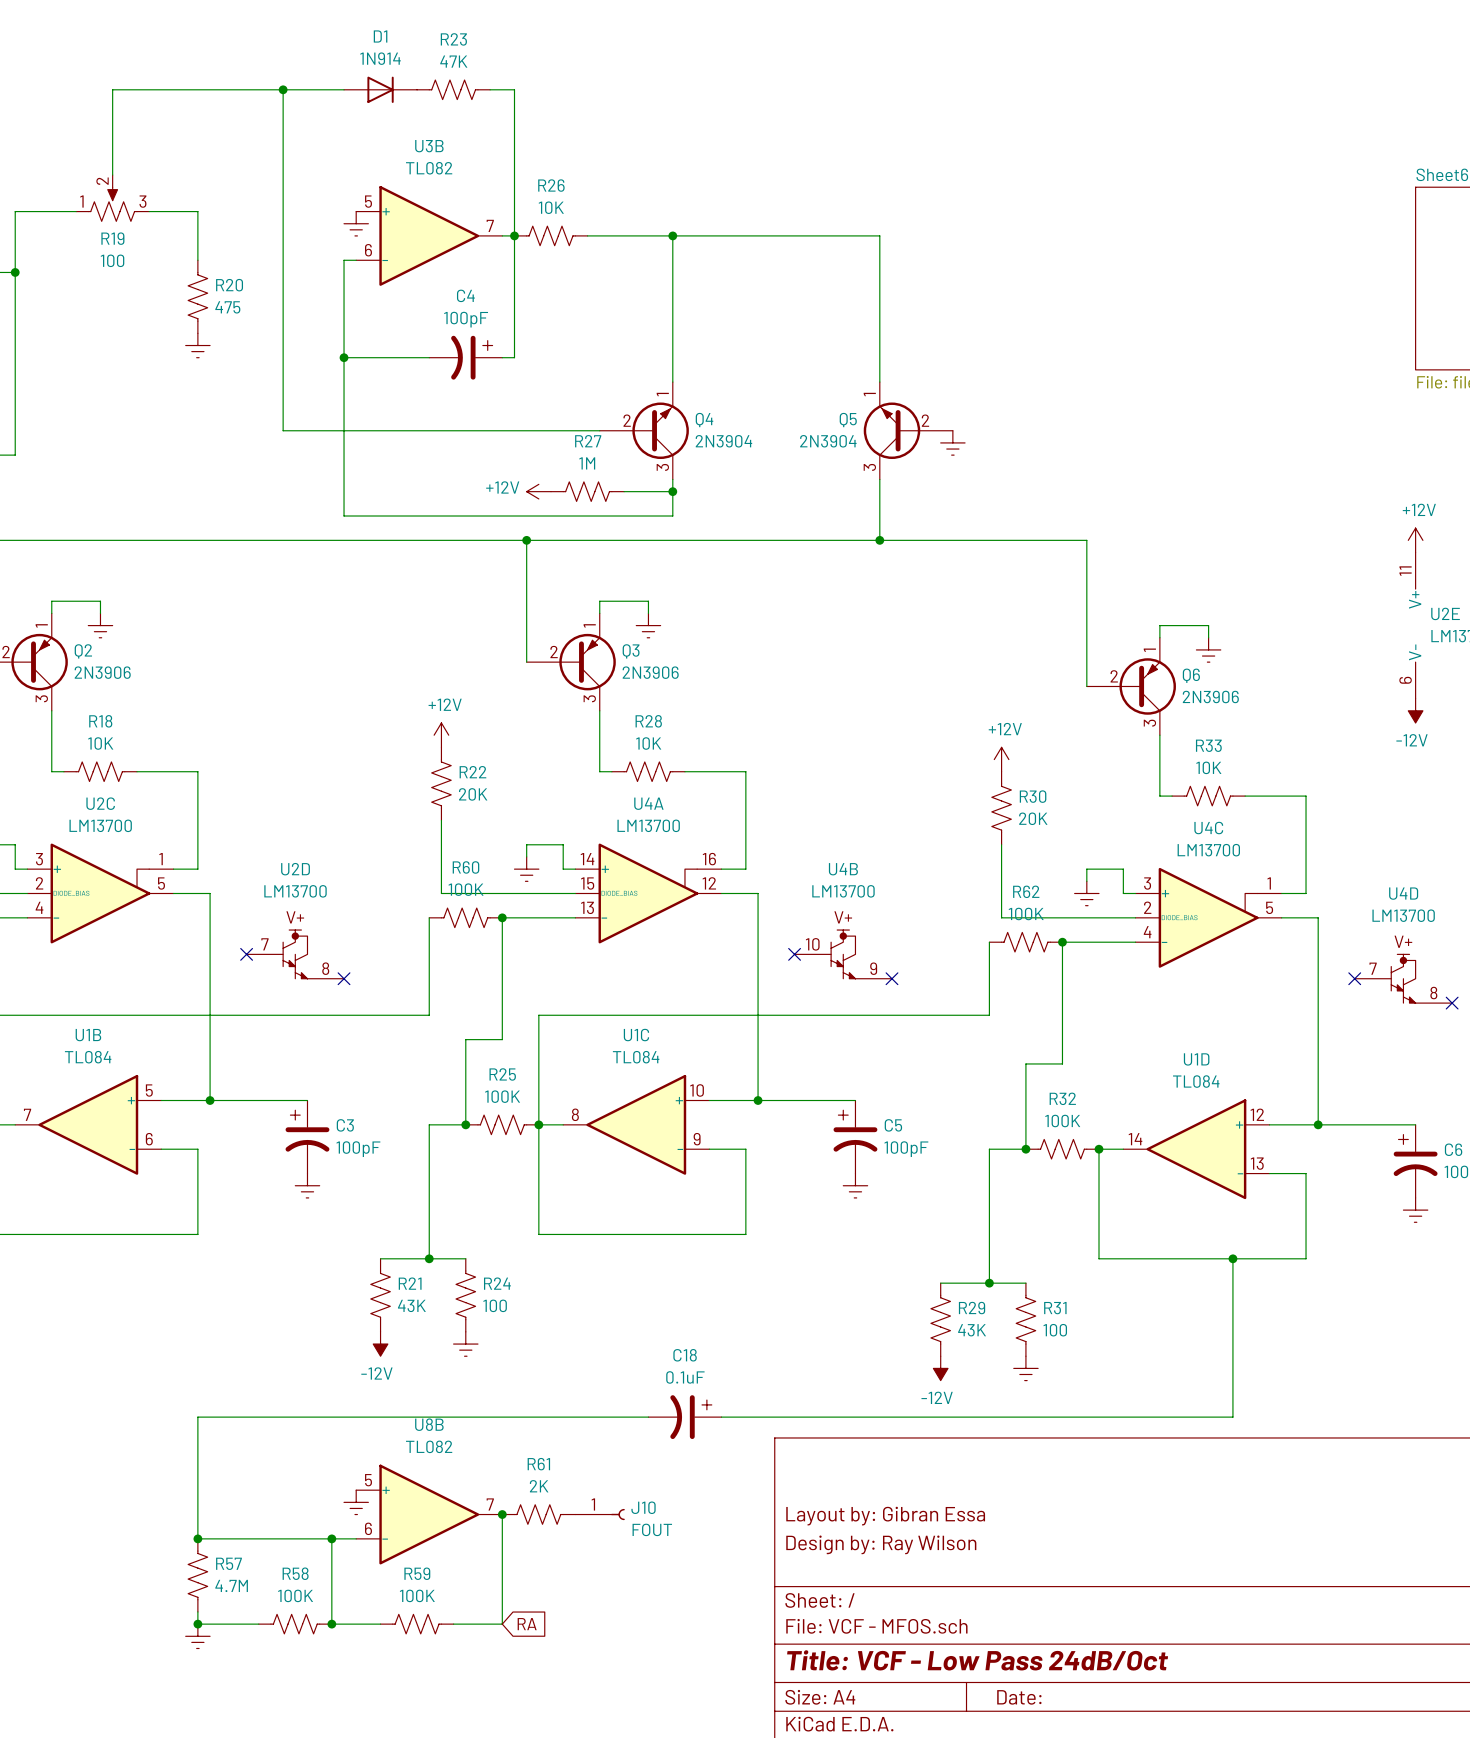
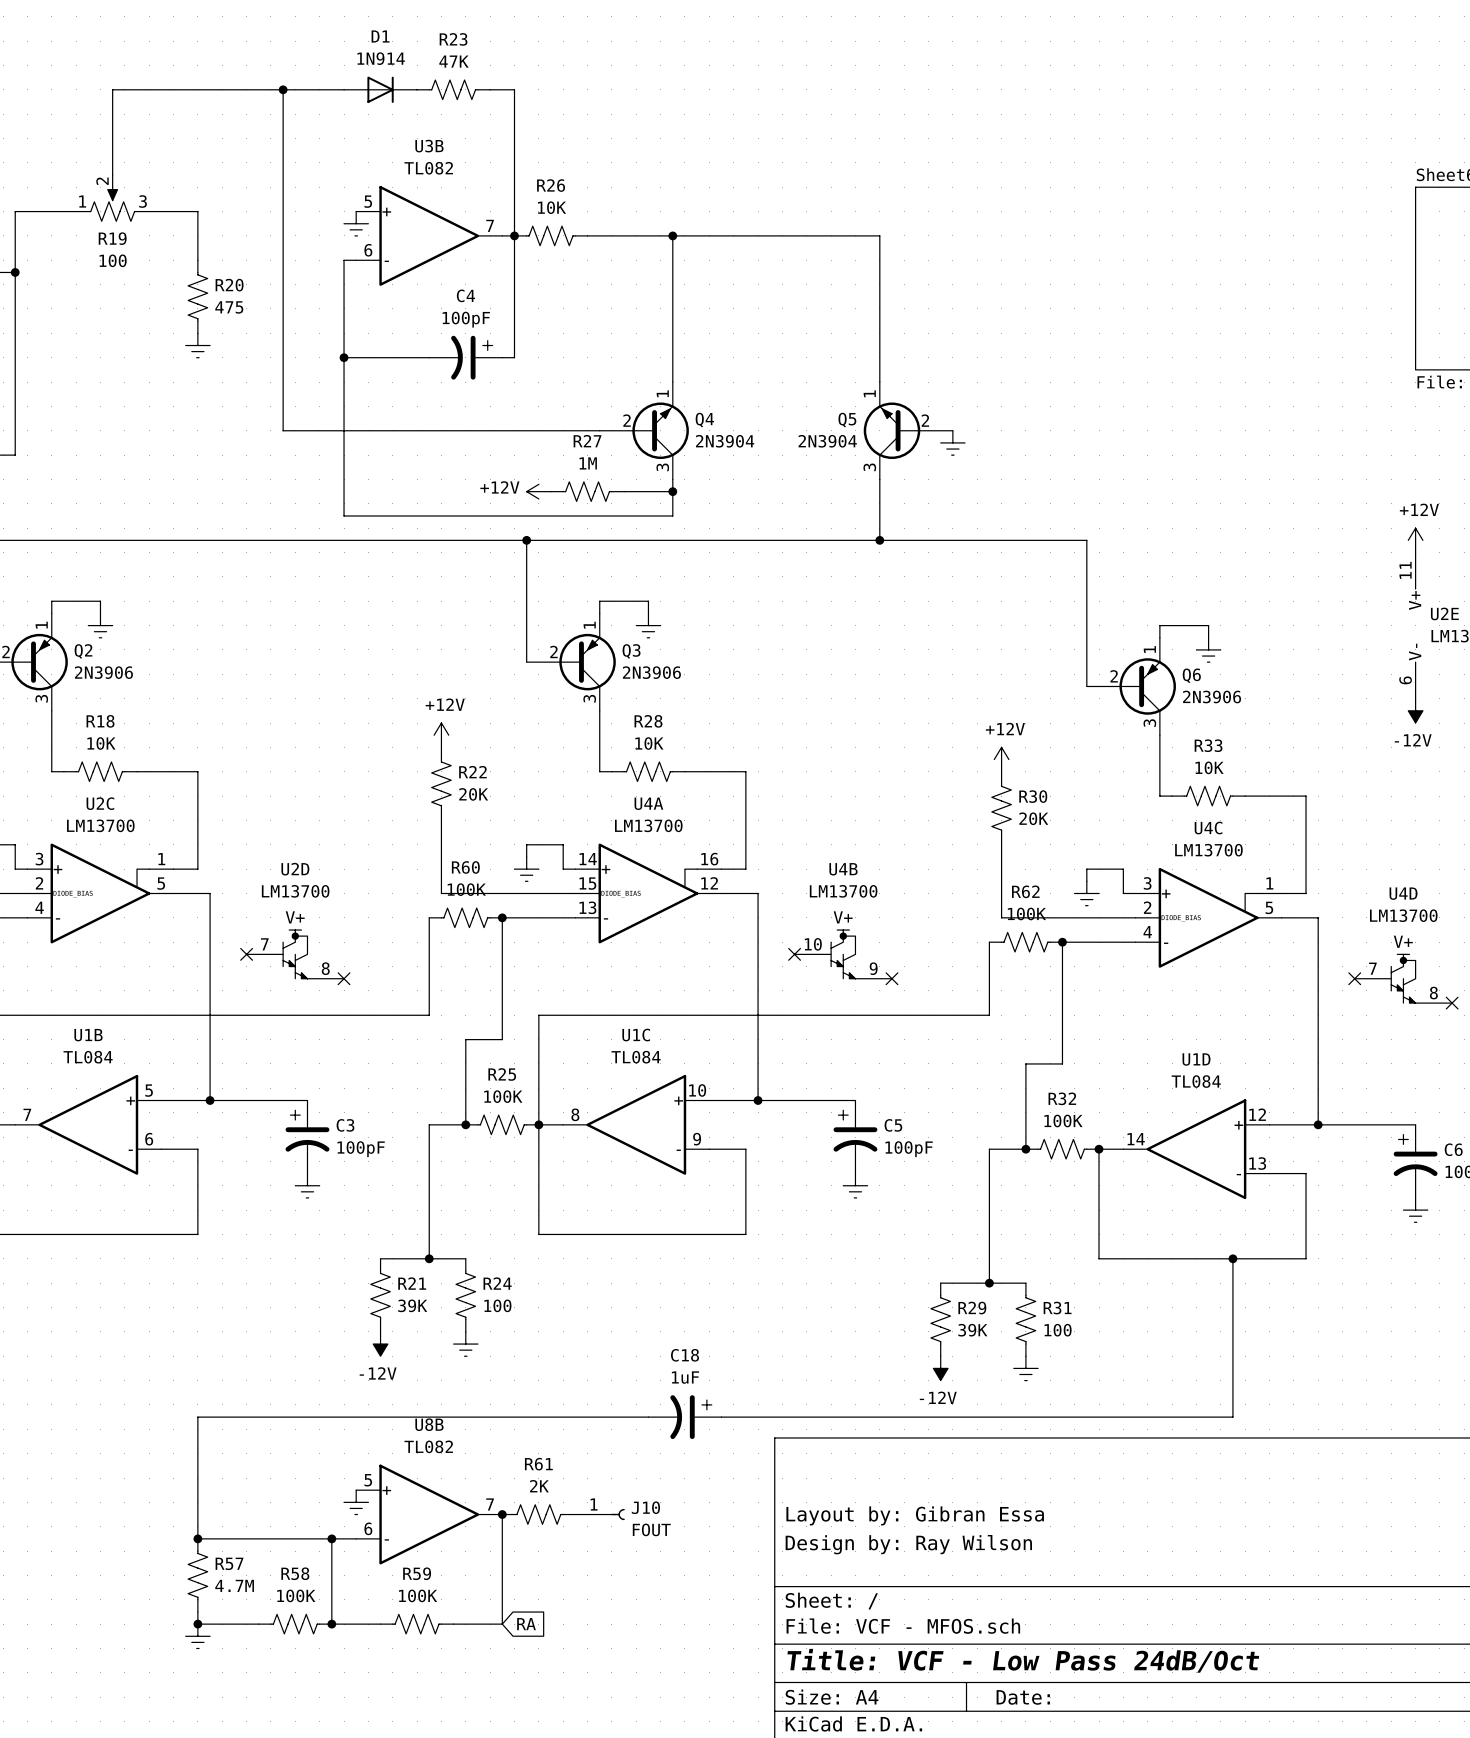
R21 value: 43K (411, 1305) -> 39K (412, 1305)
R29 value: 43K (972, 1330) -> 39K (972, 1330)
C18 value: 0.1uF (685, 1377) -> 1uF (685, 1377)

